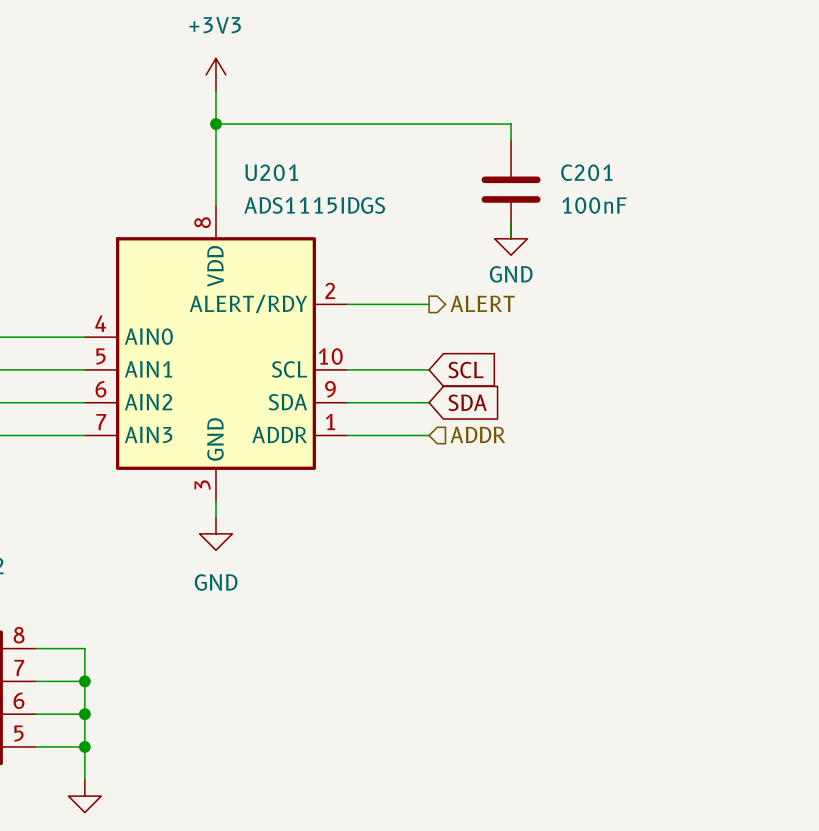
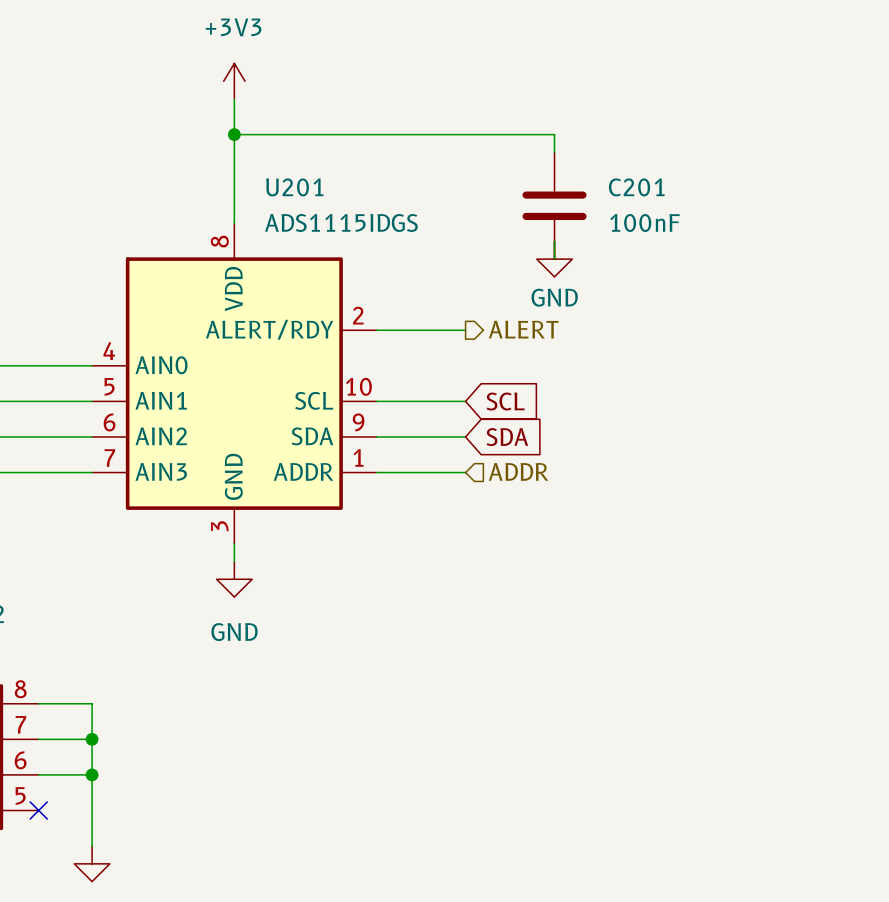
wire: (35, 746) (84, 746) -> none
no-connect mark: none -> (38, 810)
junction: (84, 746) -> none

